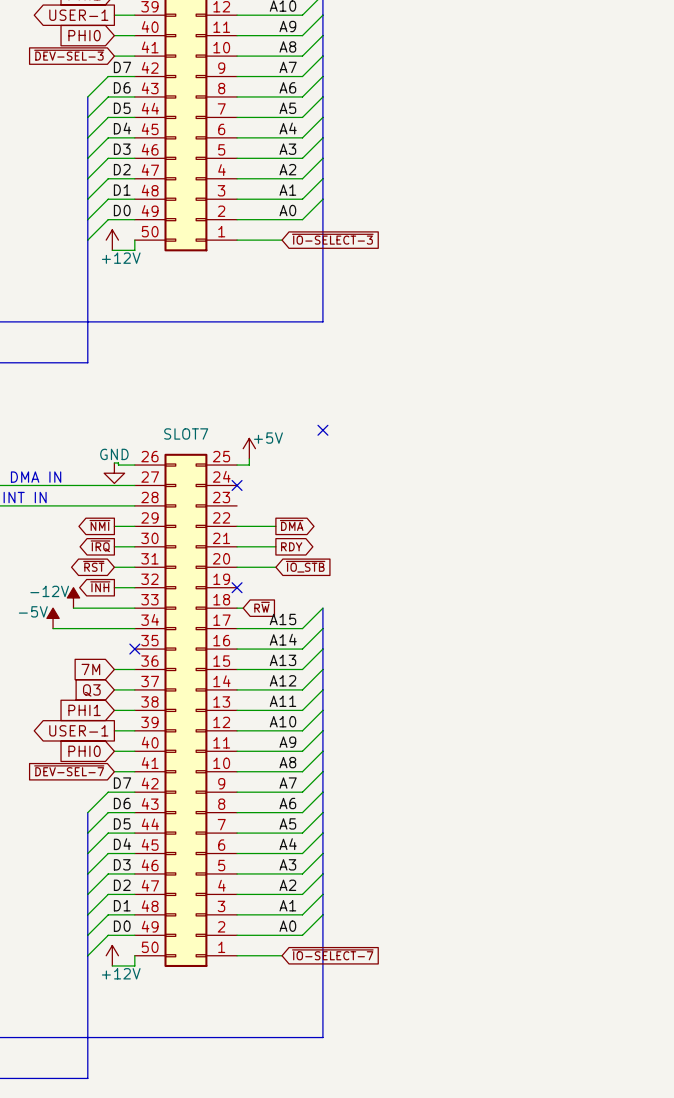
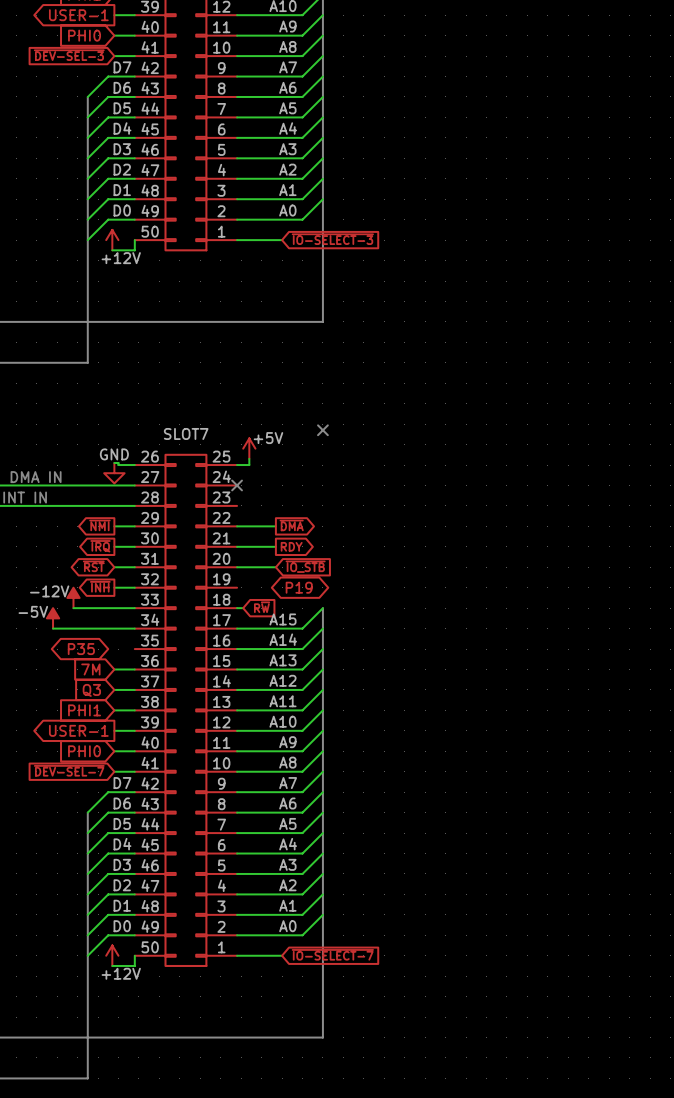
no-connect mark: (237, 587) -> none
global label: none -> P19 (299, 587)
global label: none -> P35 (81, 649)
no-connect mark: (134, 649) -> none

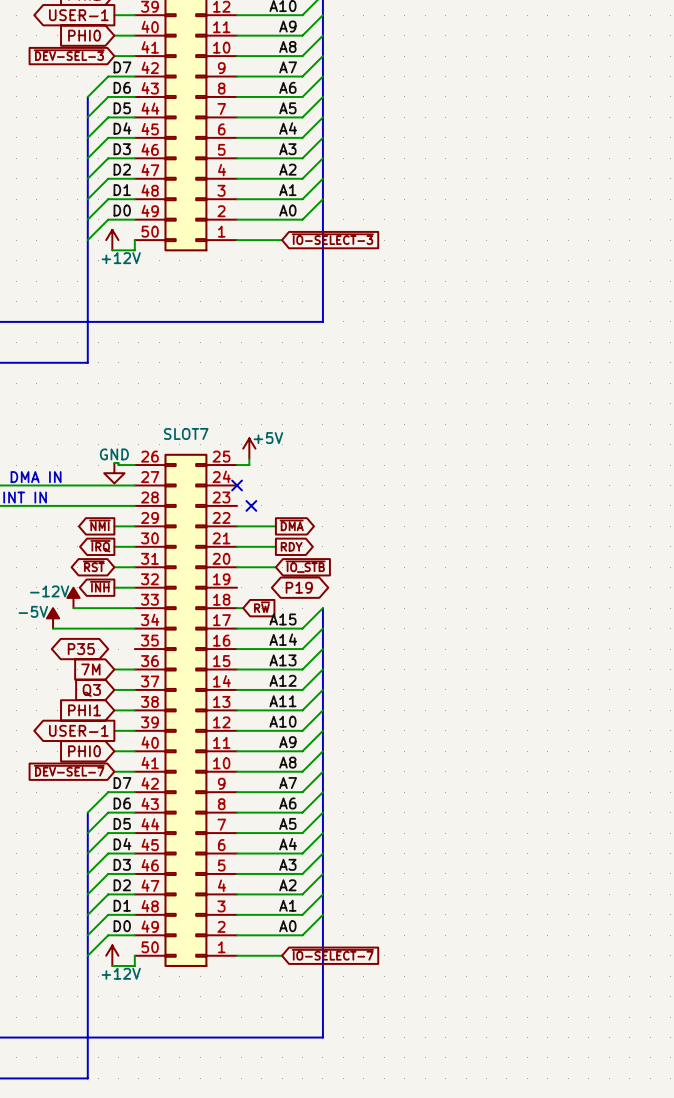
no-connect mark: (322, 430) -> none
no-connect mark: none -> (251, 505)

